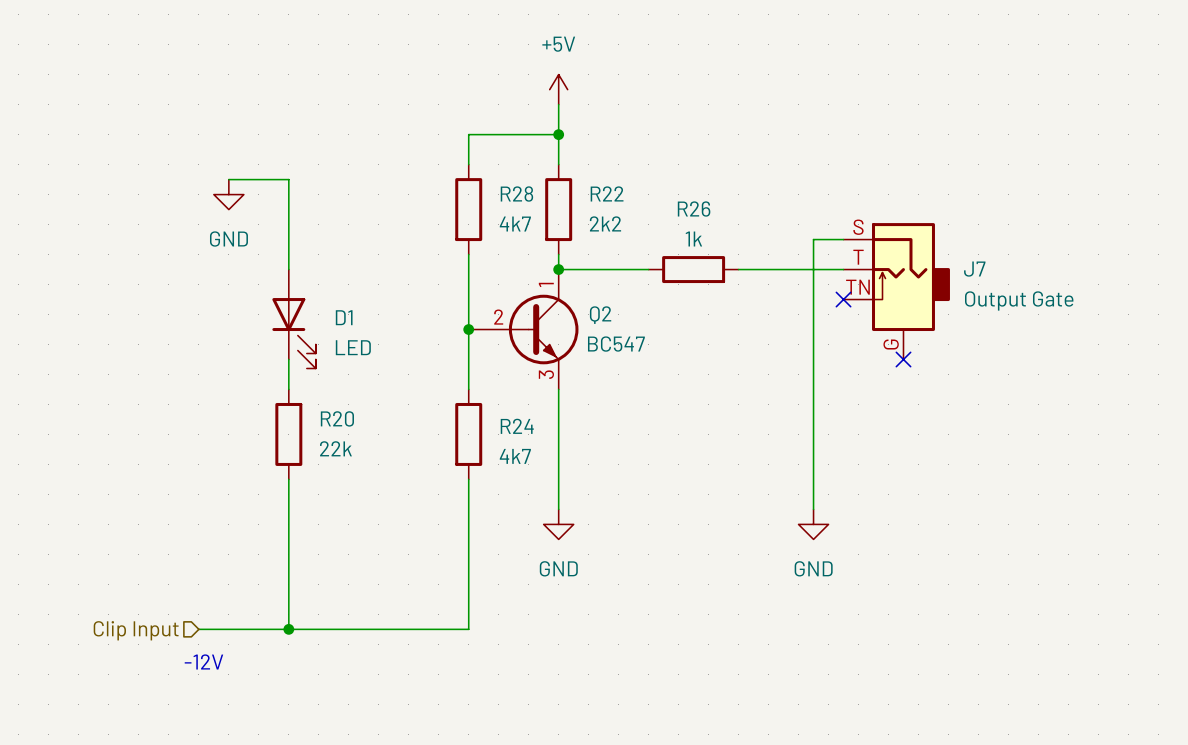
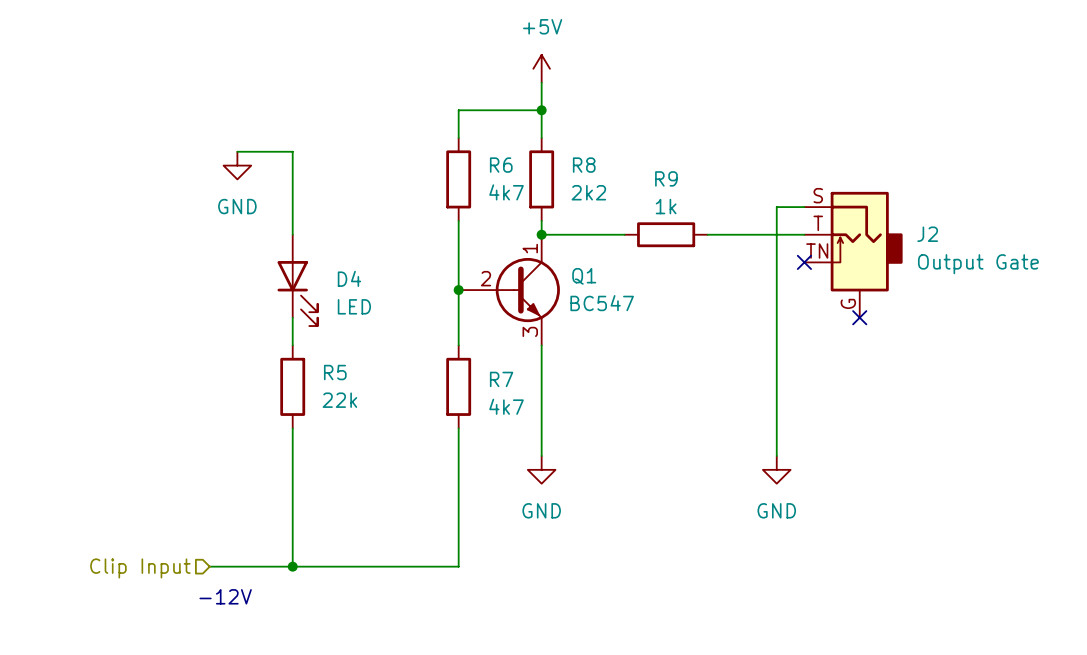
R22 name: R22 (607, 193) -> R8 (584, 165)
R28 name: R28 (516, 194) -> R6 (501, 165)
R26 name: R26 (694, 209) -> R9 (666, 178)
J7 name: J7 (974, 269) -> J2 (927, 234)
Q2 name: Q2 (600, 315) -> Q1 (584, 276)
D1 name: D1 (344, 317) -> D4 (349, 278)
R20 name: R20 (337, 418) -> R5 (335, 372)
R24 name: R24 (517, 426) -> R7 (501, 379)

